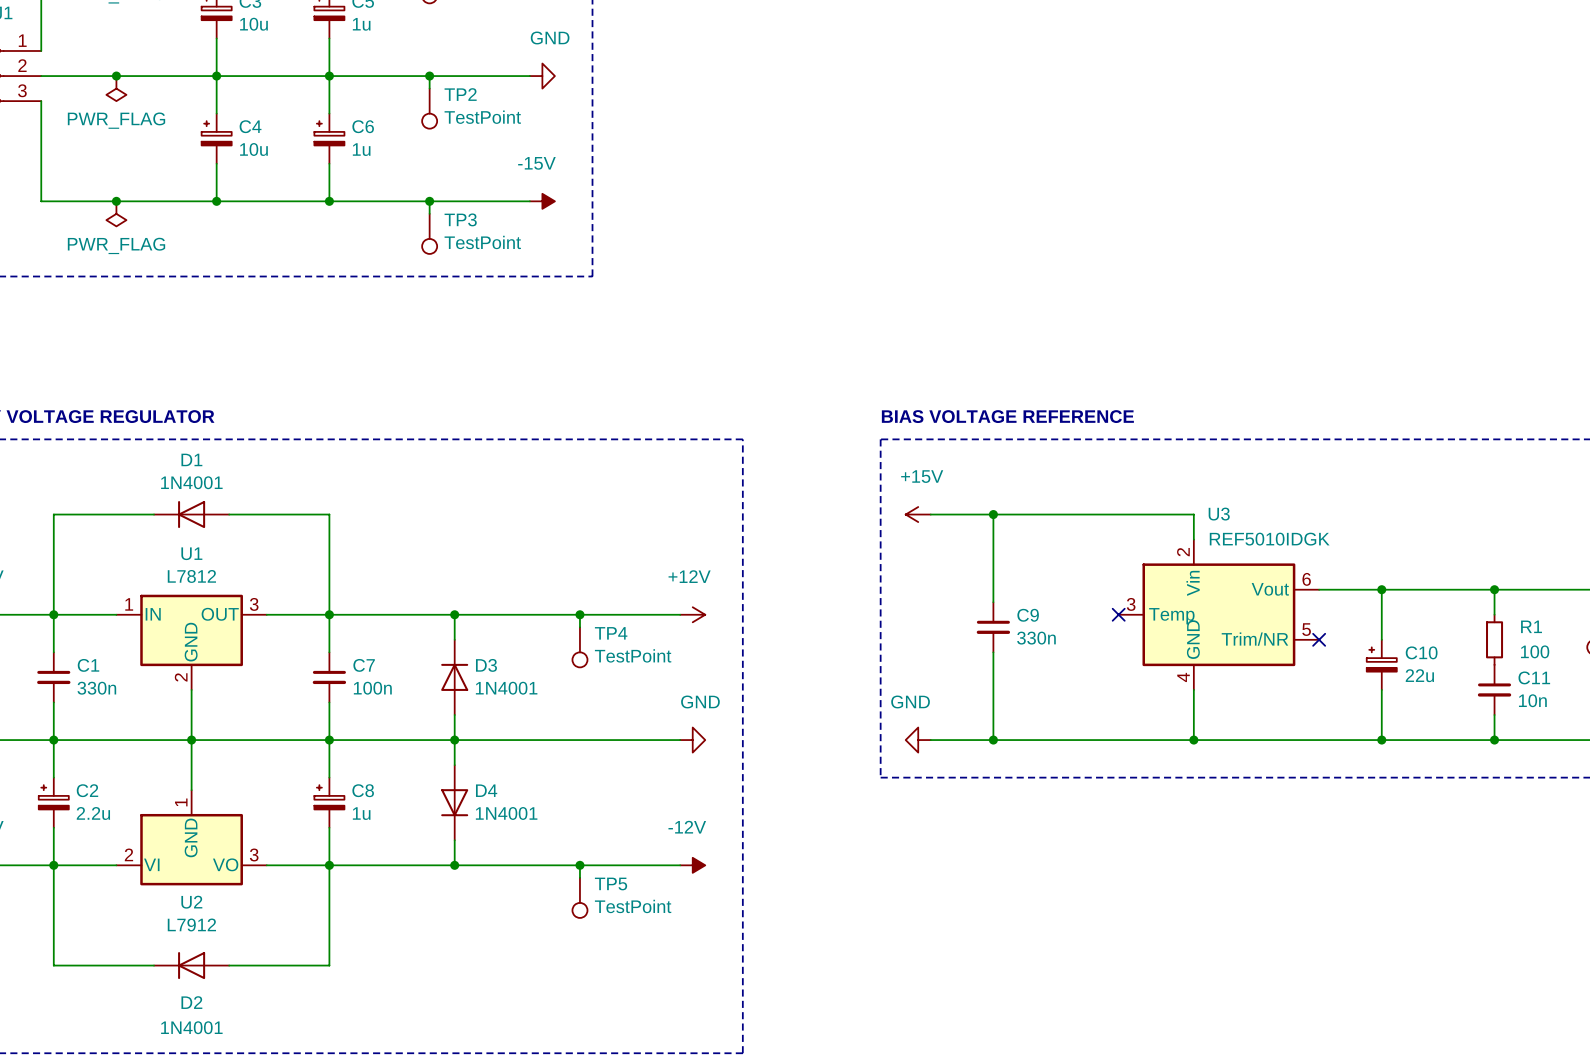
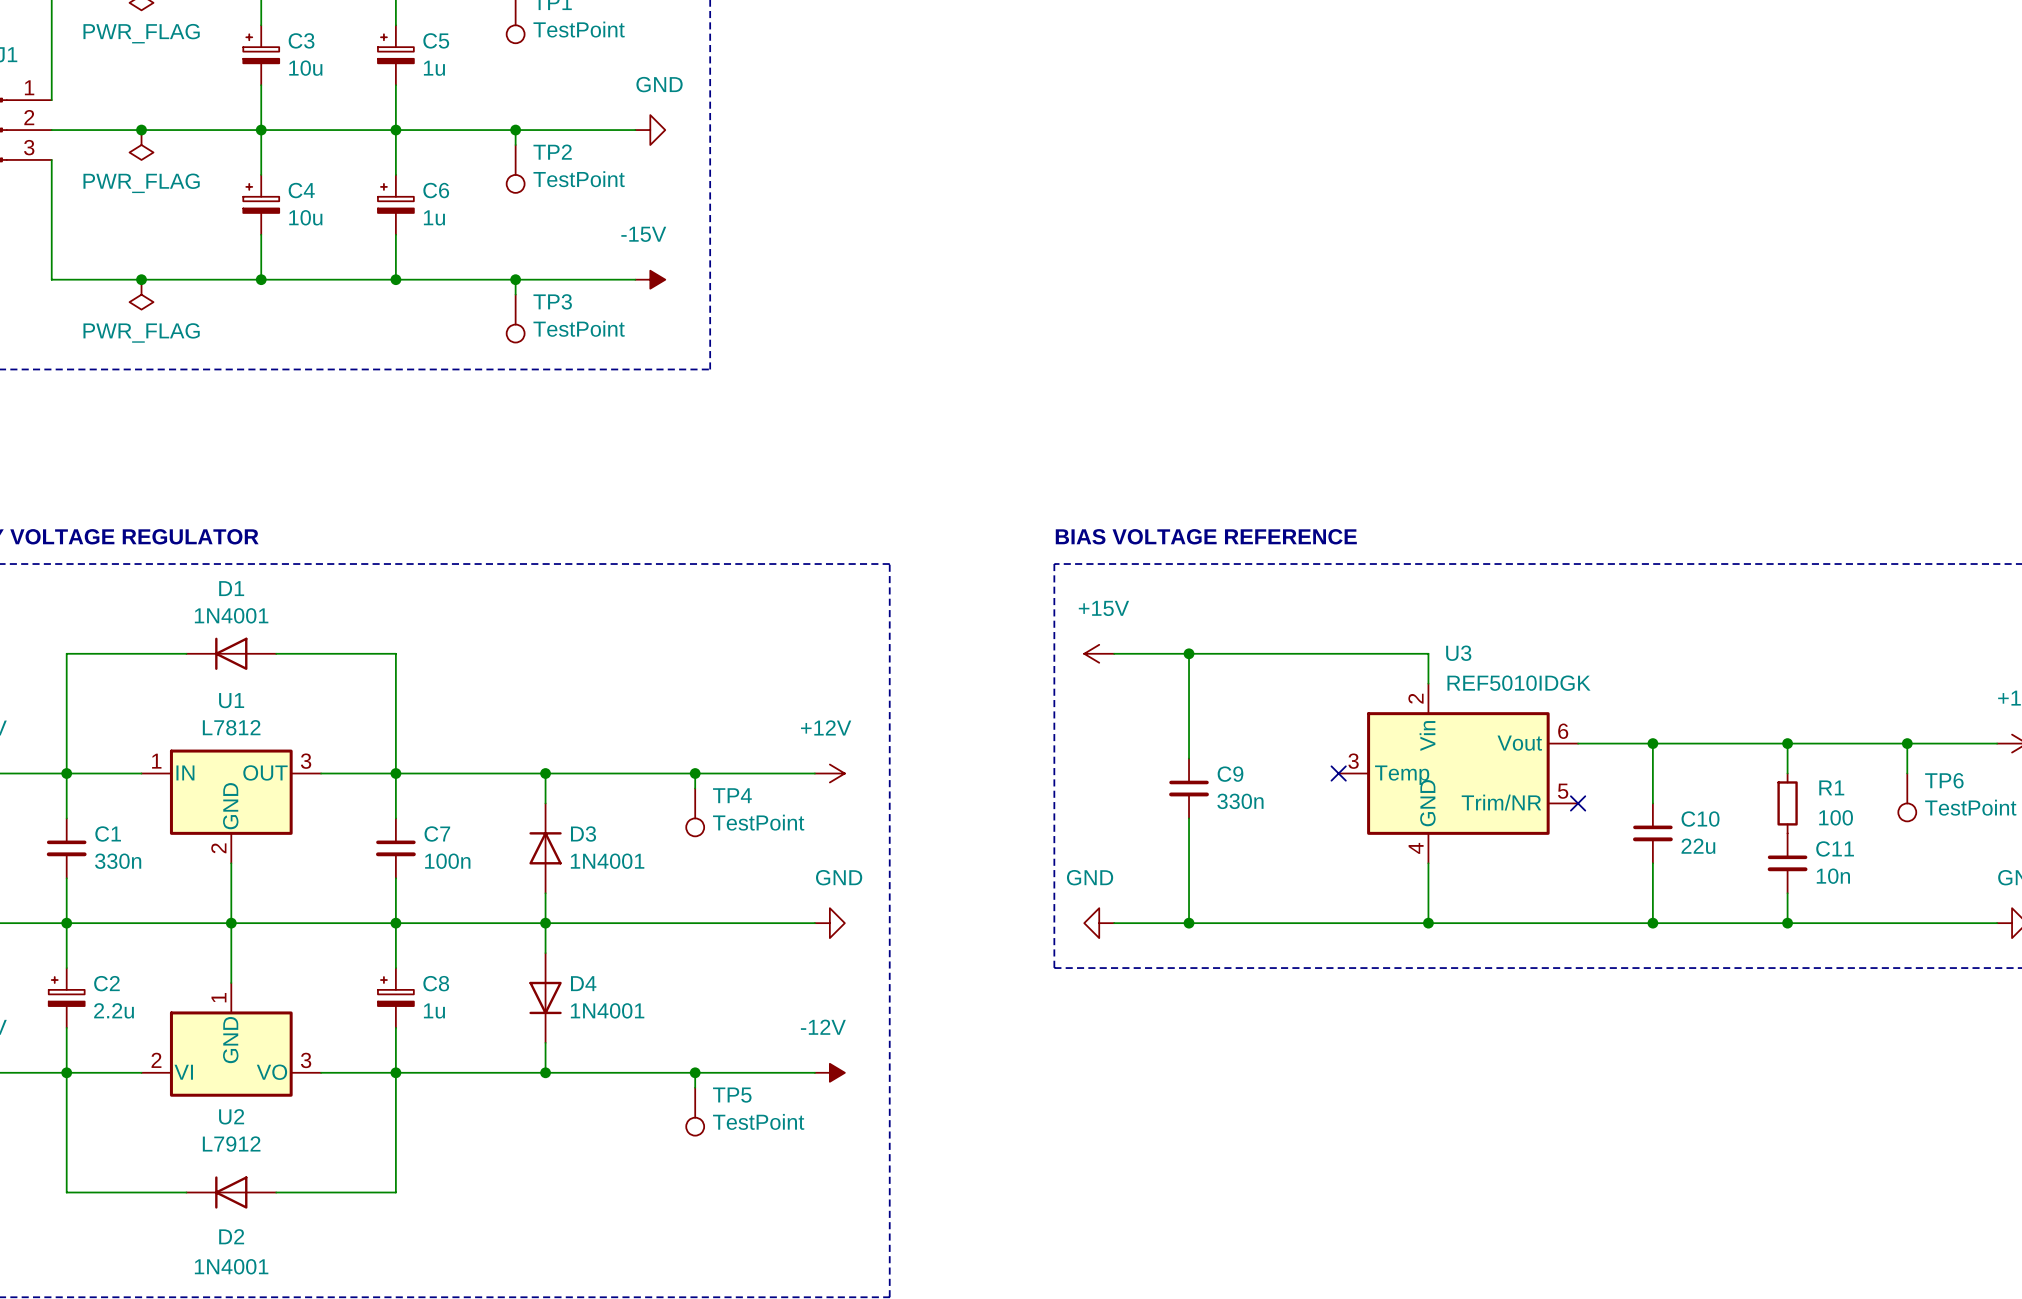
C10 symbol: [1366, 639, 1397, 690] -> [1633, 803, 1673, 864]

